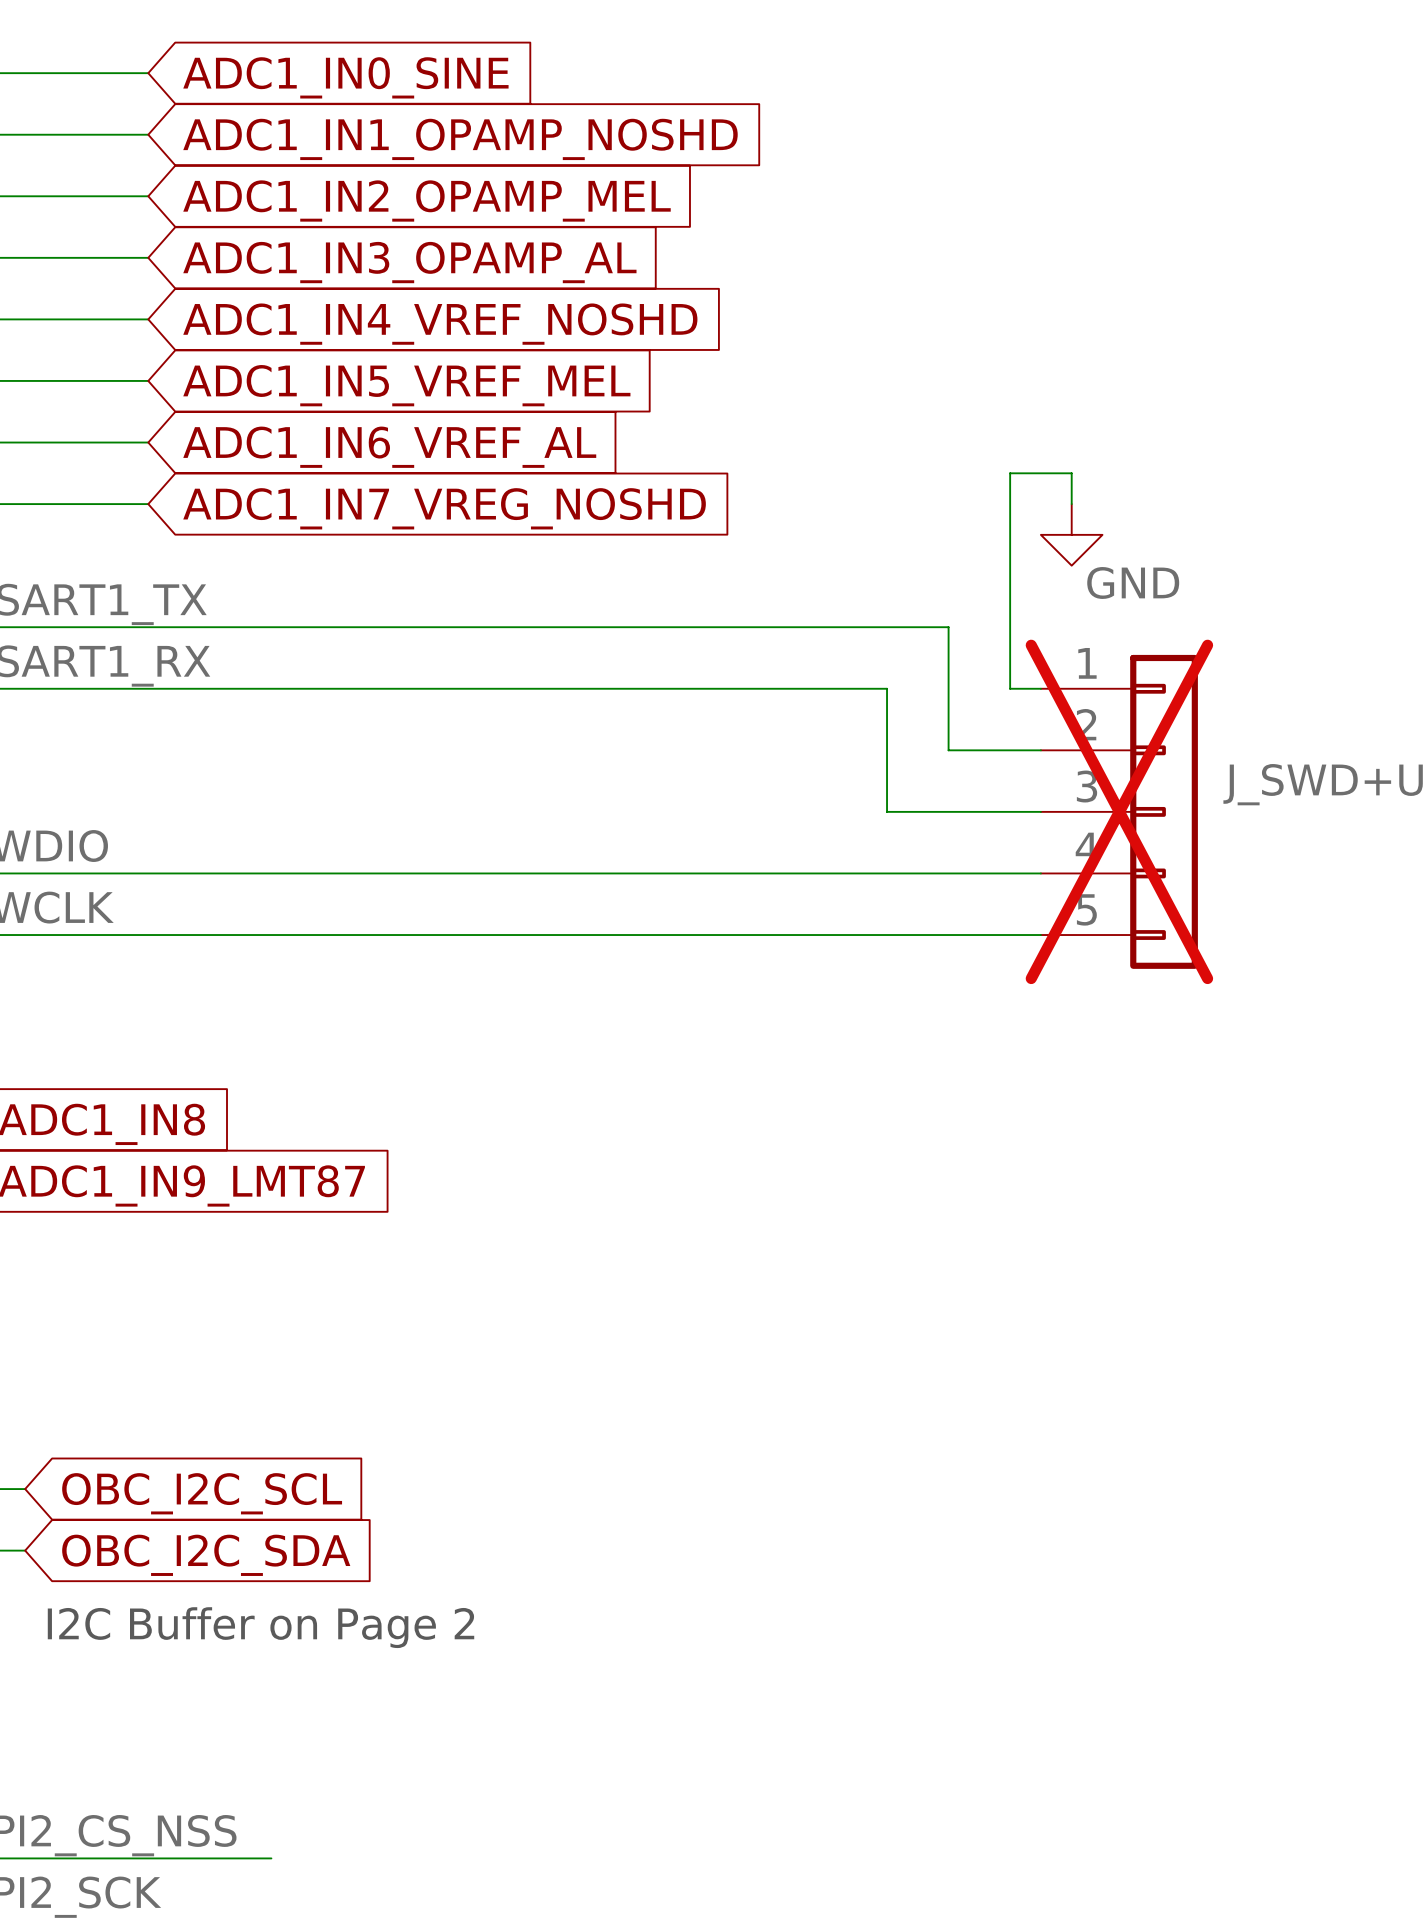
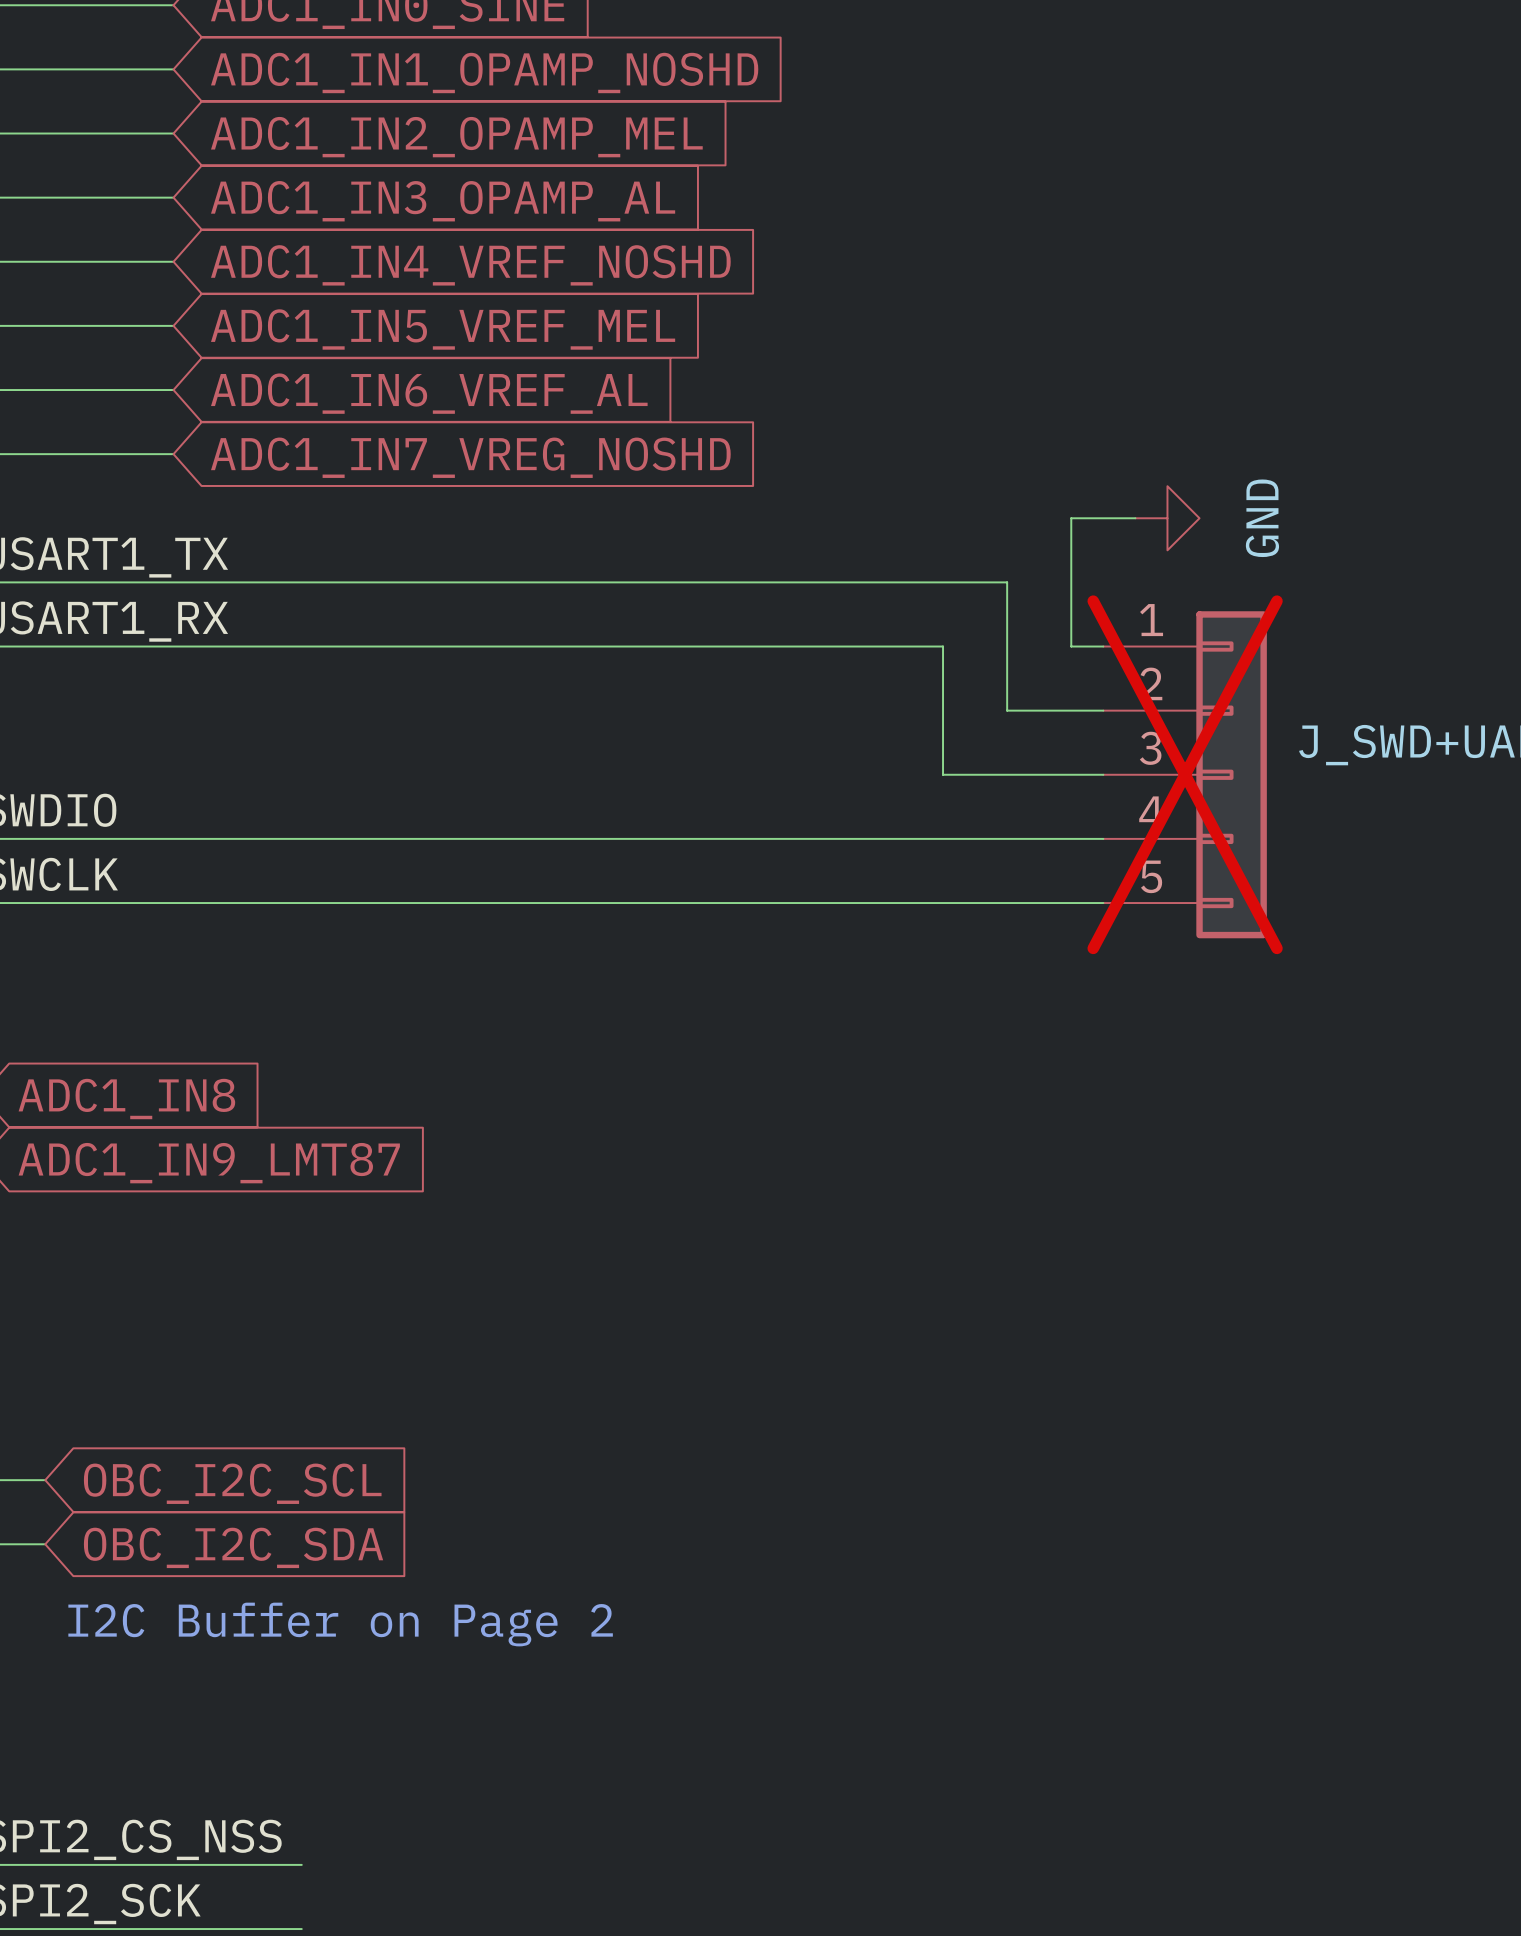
wire: (1071, 504) (1071, 473) (1010, 473) (1010, 565) -> (1135, 518) (1071, 518)
power symbol rotation: 0° (1071, 534) -> 90° counterclockwise (1167, 518)
power symbol position: GND (1071, 534) -> GND (1167, 518)
power symbol text position: GND (1133, 582) -> GND (1262, 518)

